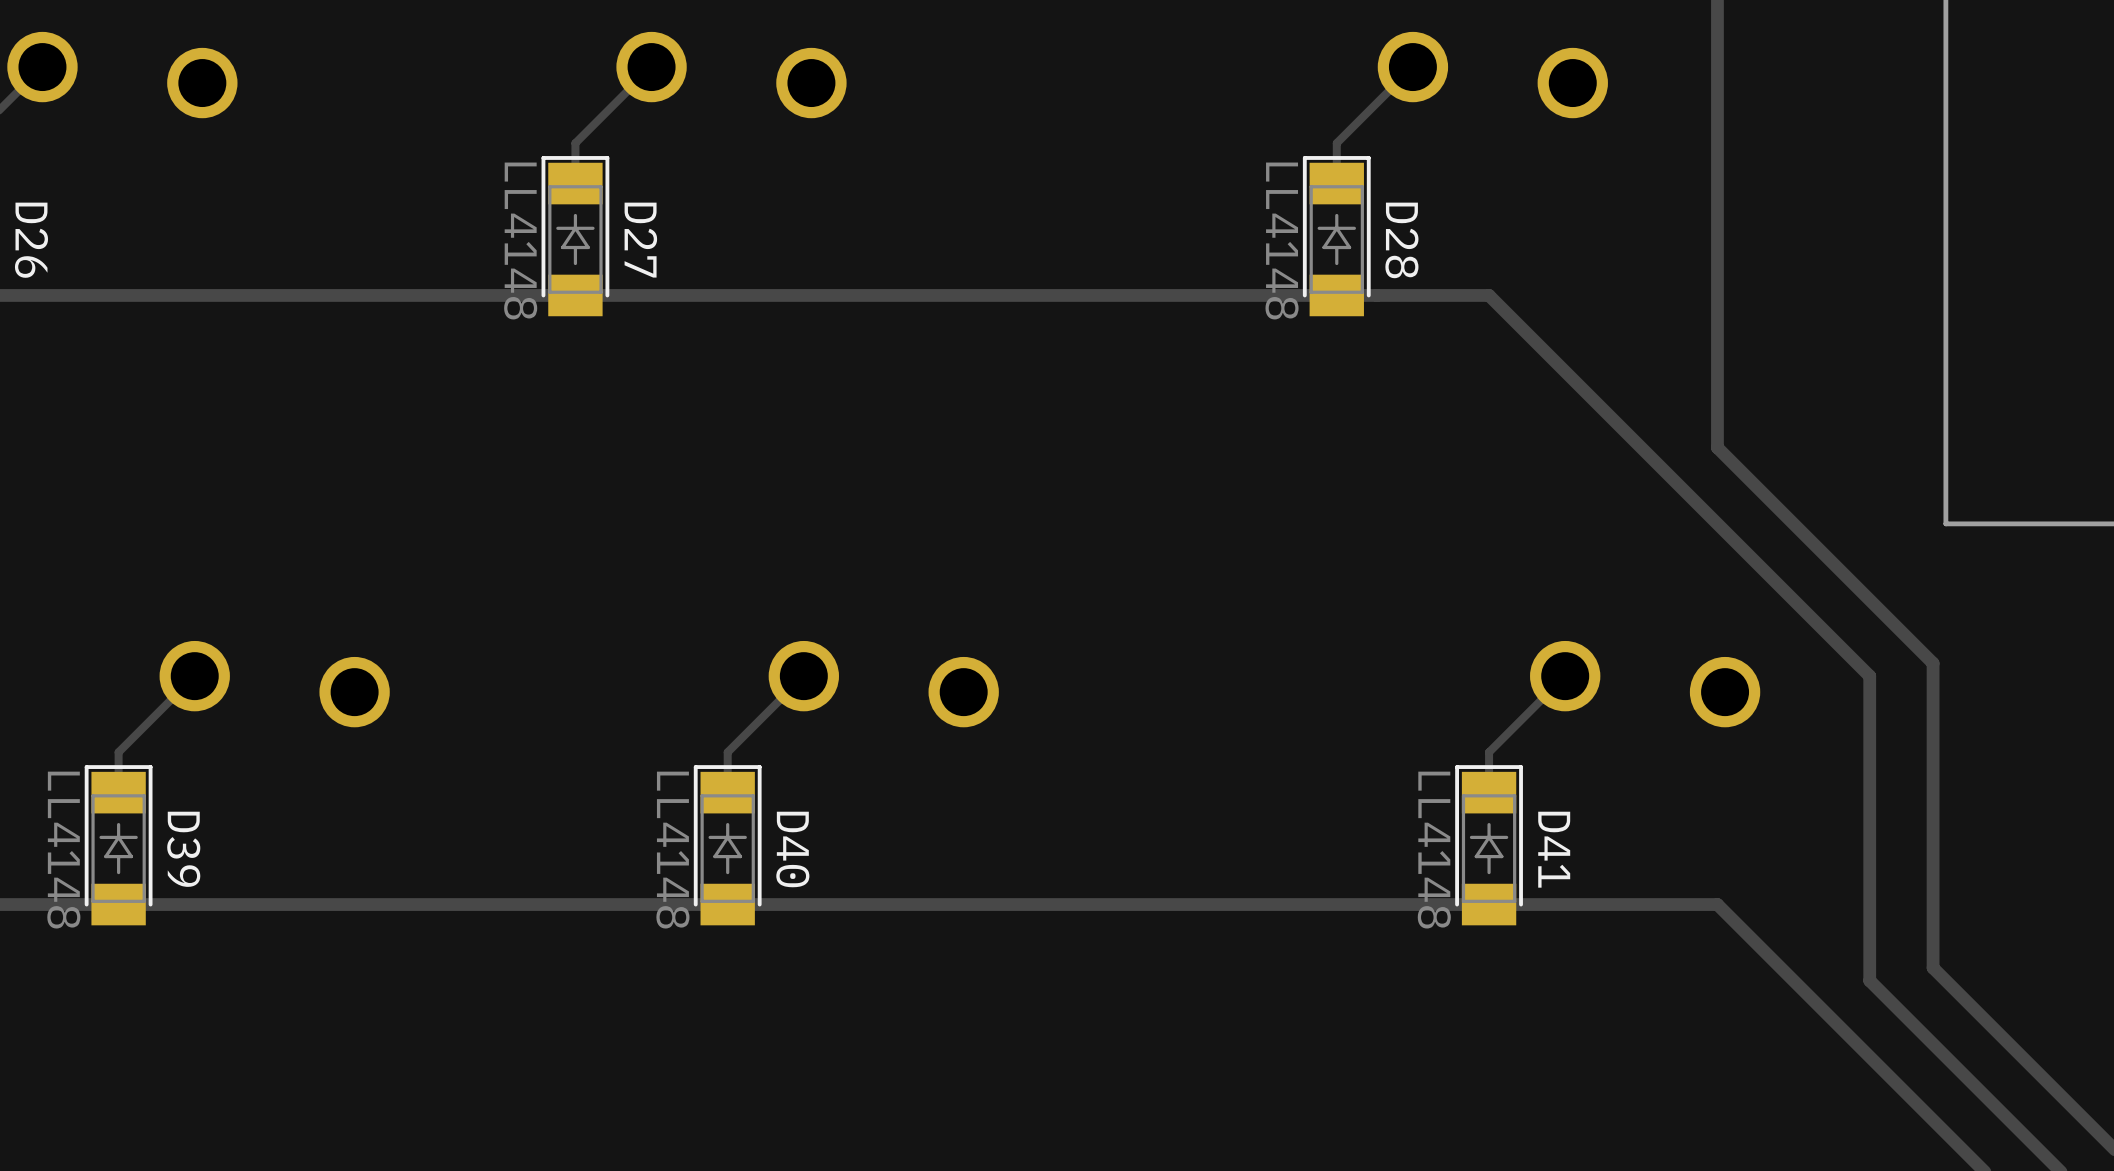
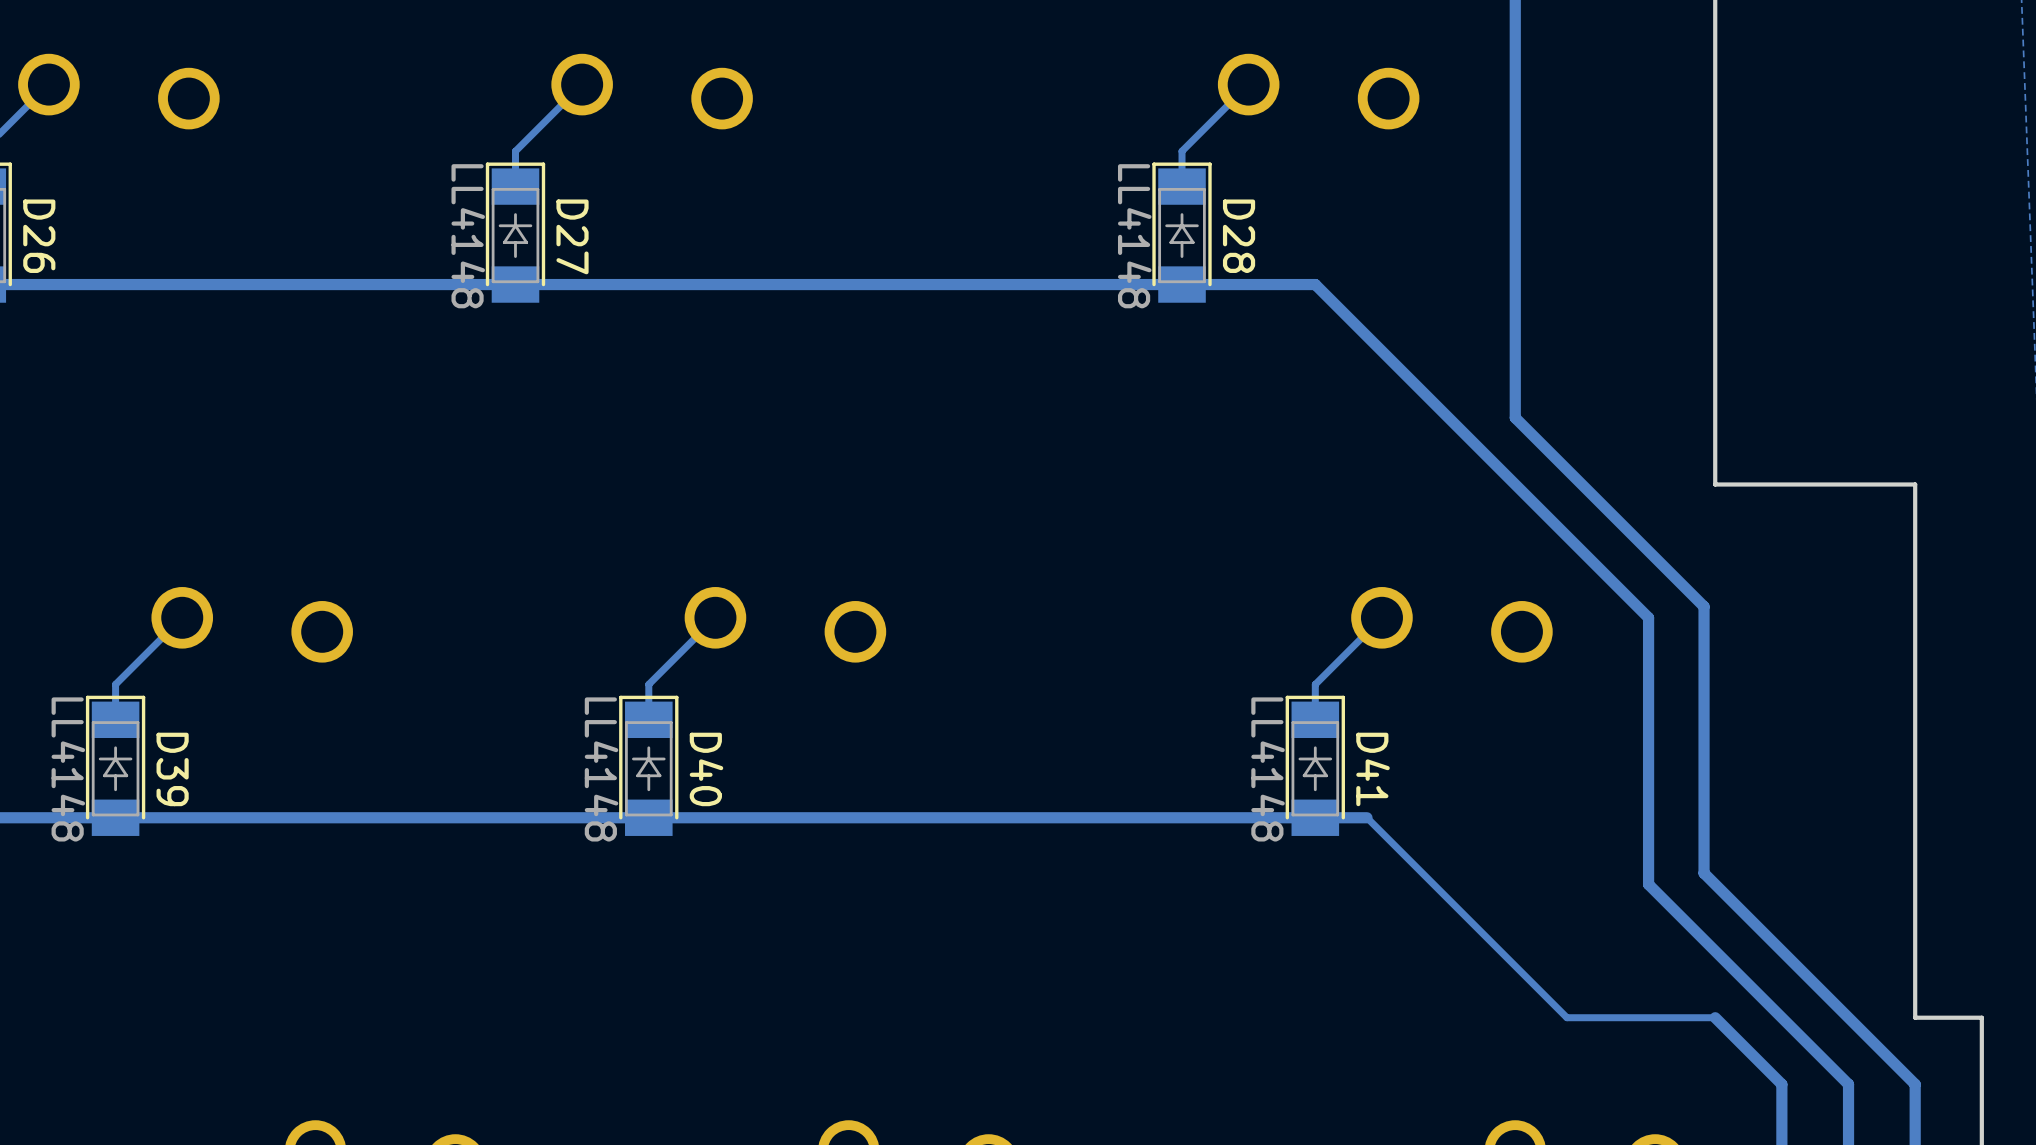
track: (1548, 904) (1717, 904) (1945, 1132) -> (1367, 817) (1566, 1017) (1715, 1017)

